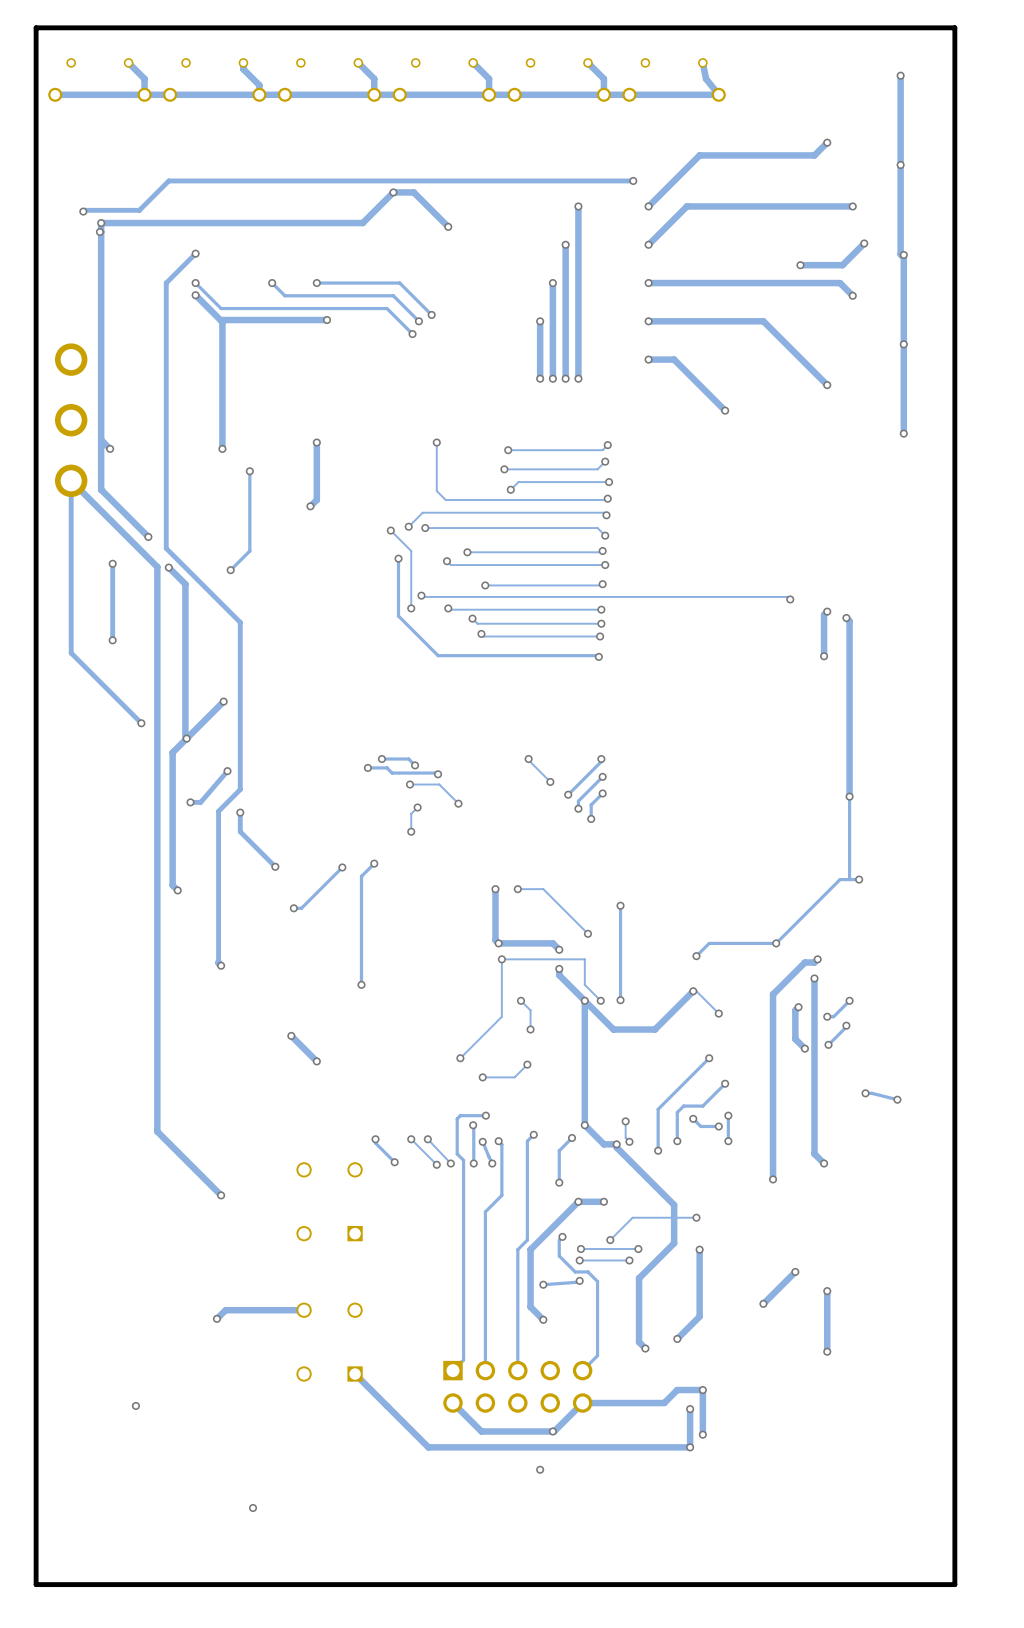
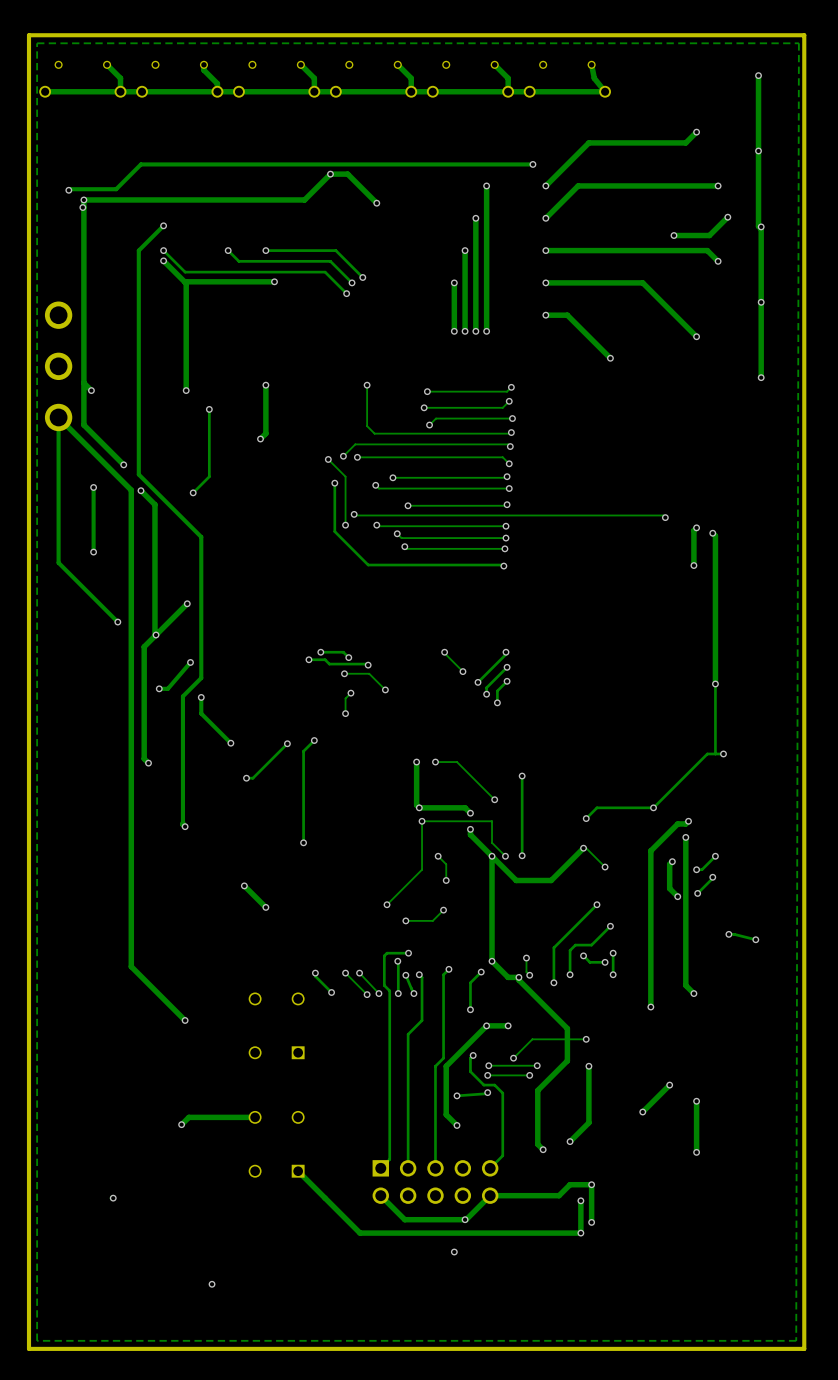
zone outline: none -> (798, 43) (37, 43) (37, 1340) (796, 1340) (798, 43)

